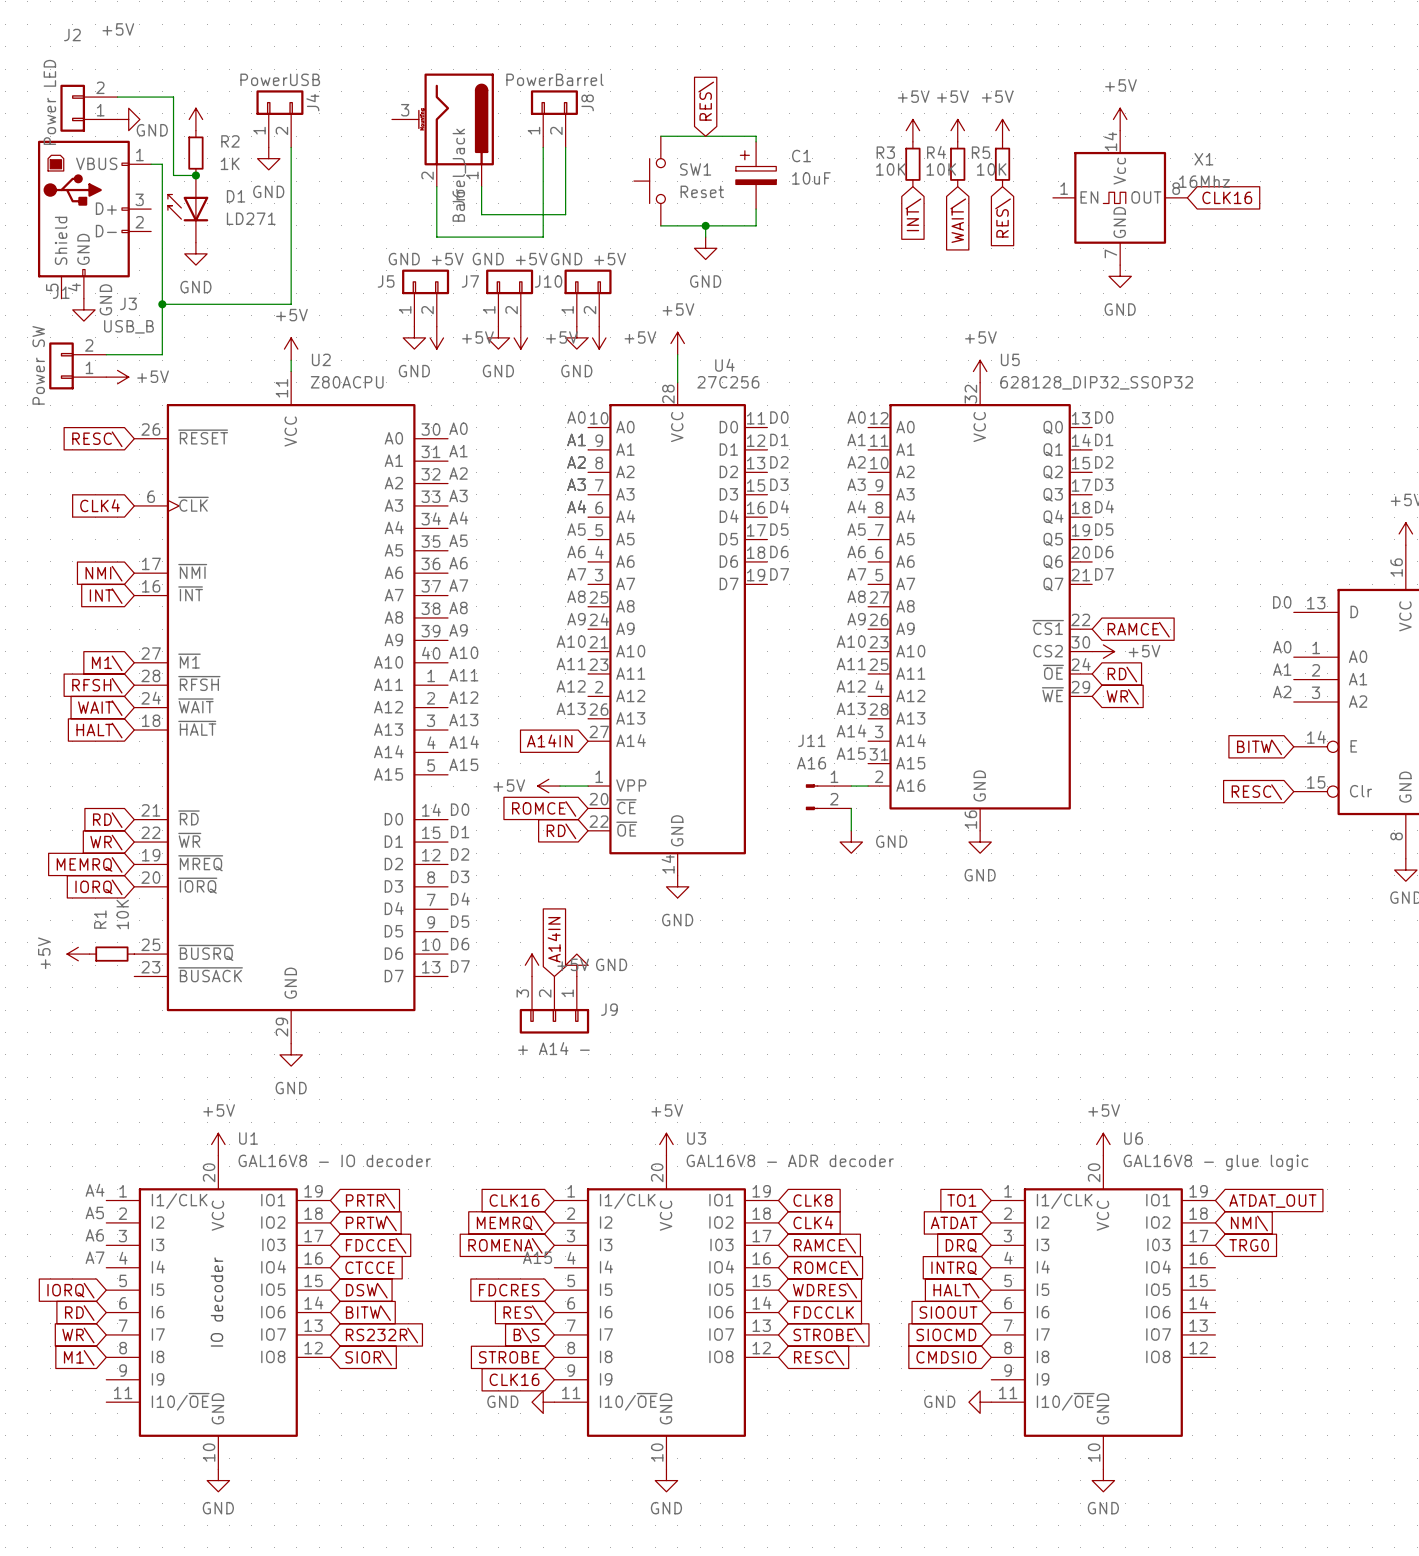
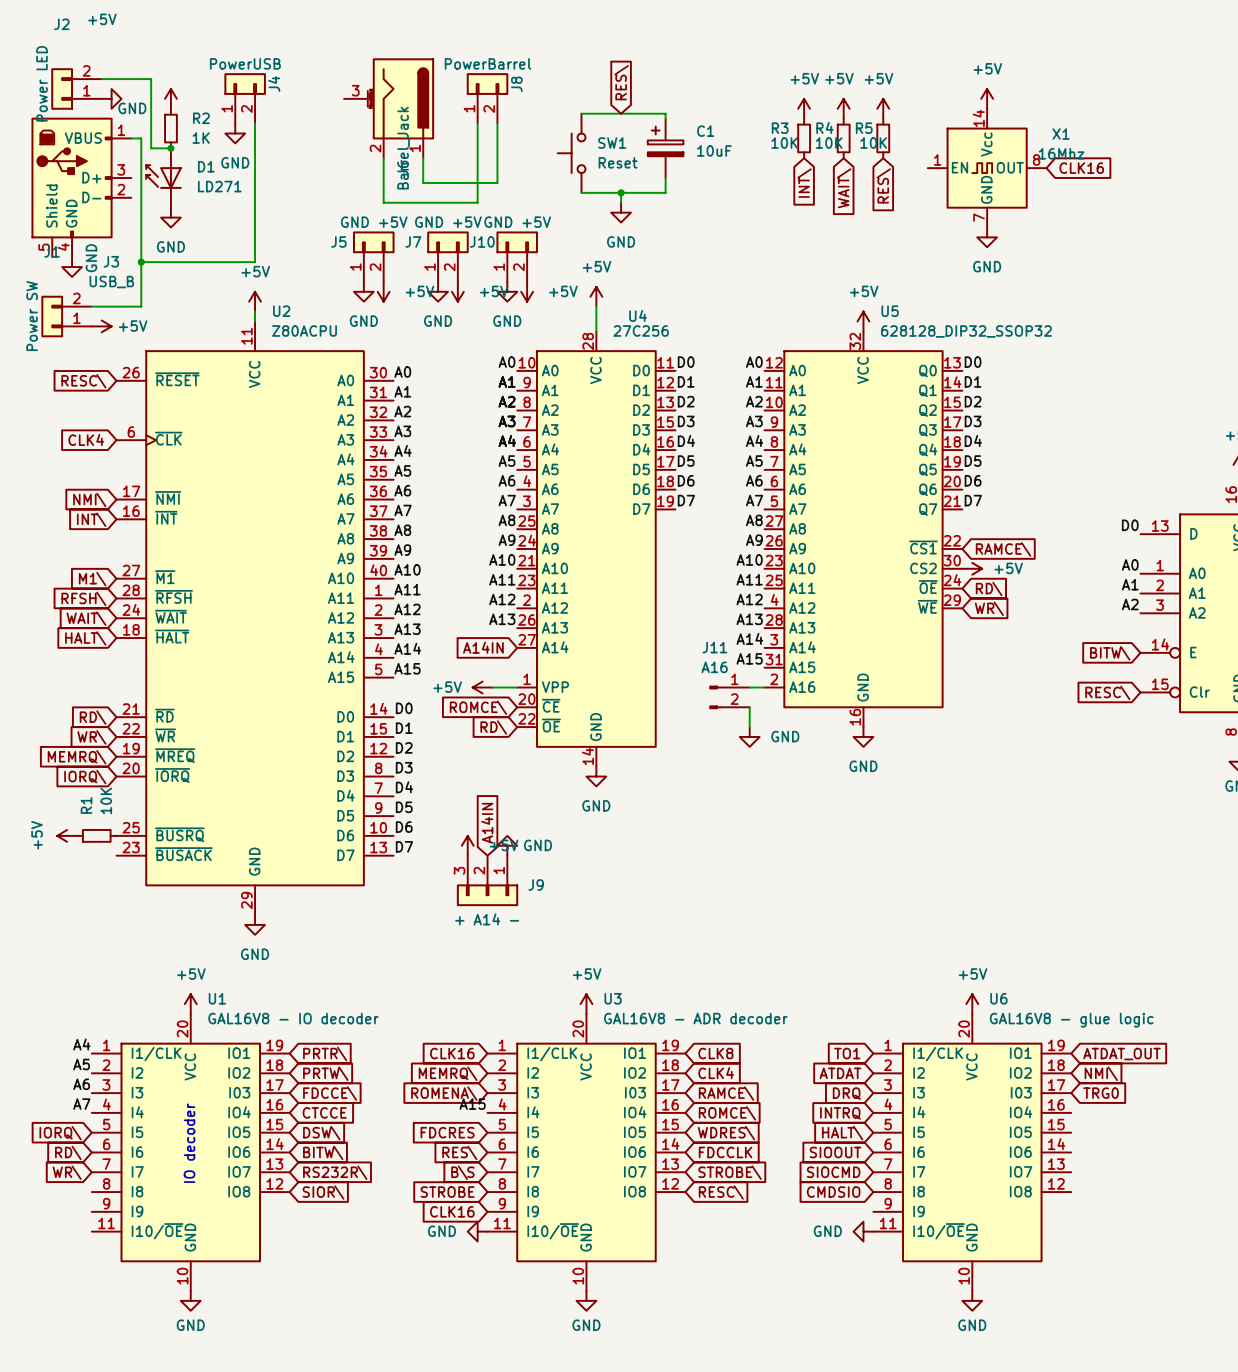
global label: M1\ (79, 1357) -> none

